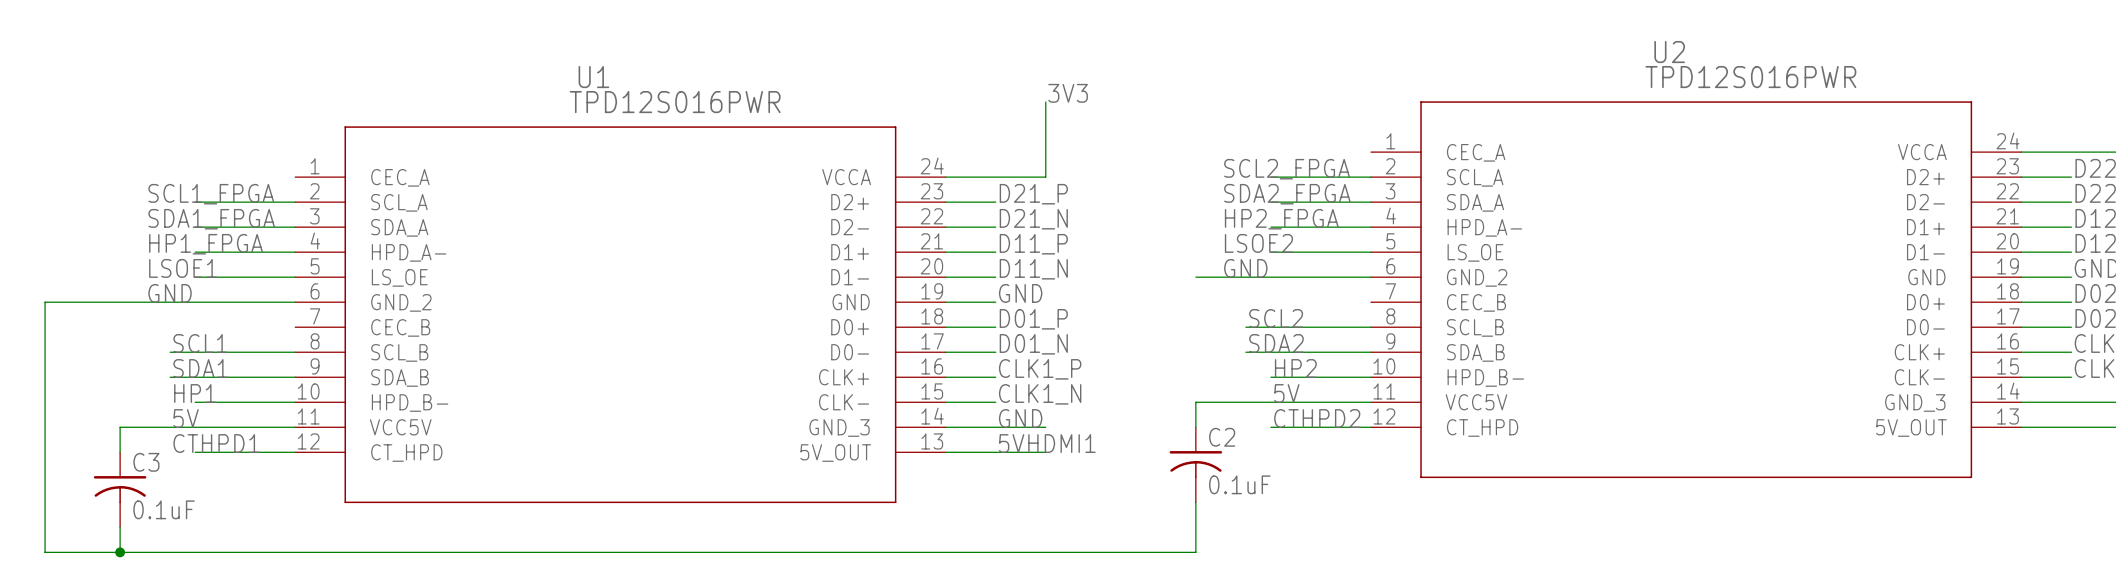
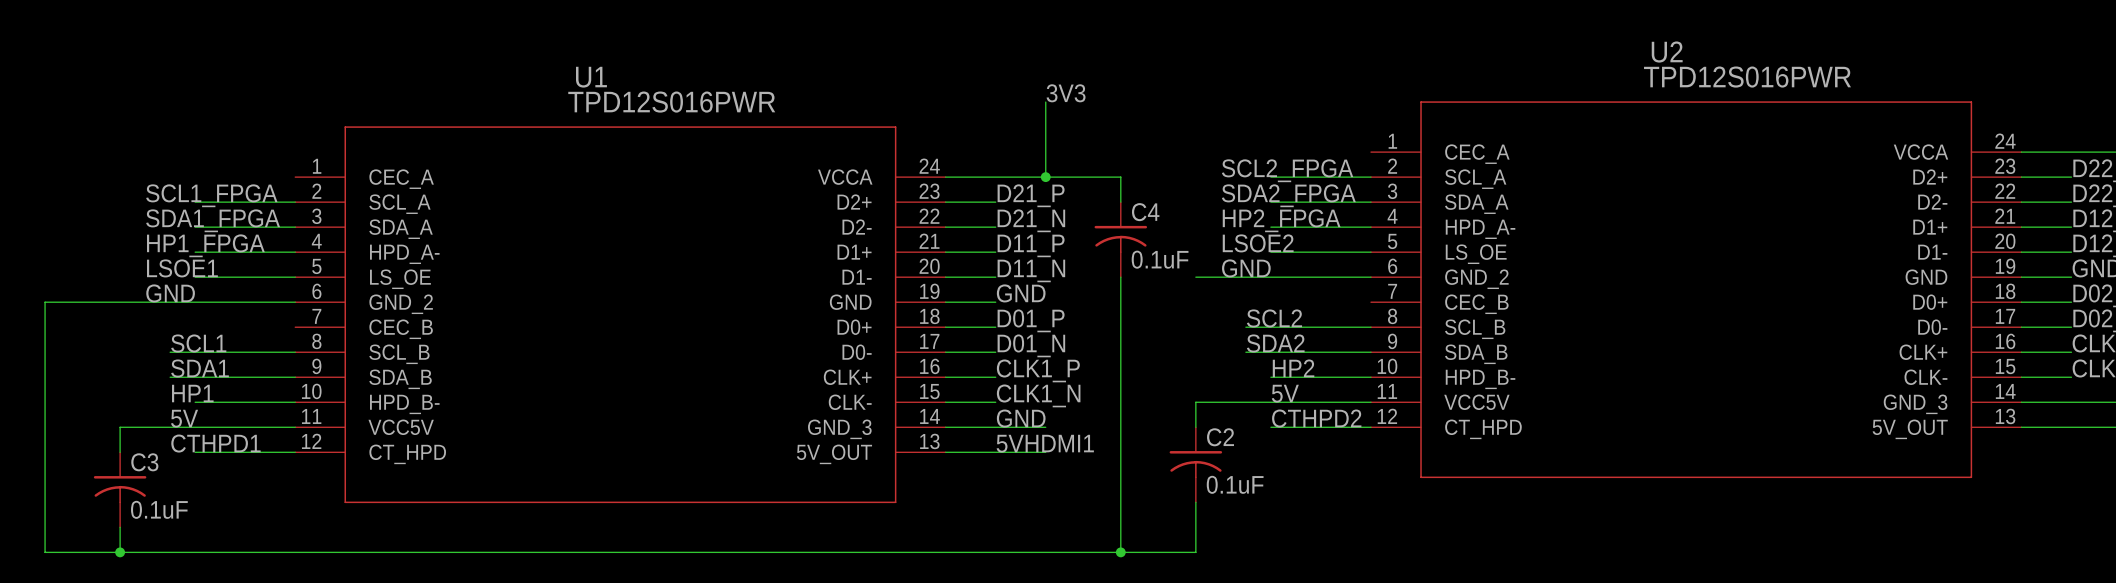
wire: none -> (1045, 177) (1120, 177) (1120, 202)
junction: none -> (1045, 177)
C4: none -> 0.1uF (1120, 239)
wire: none -> (1120, 277) (1120, 552)
junction: none -> (1120, 552)

